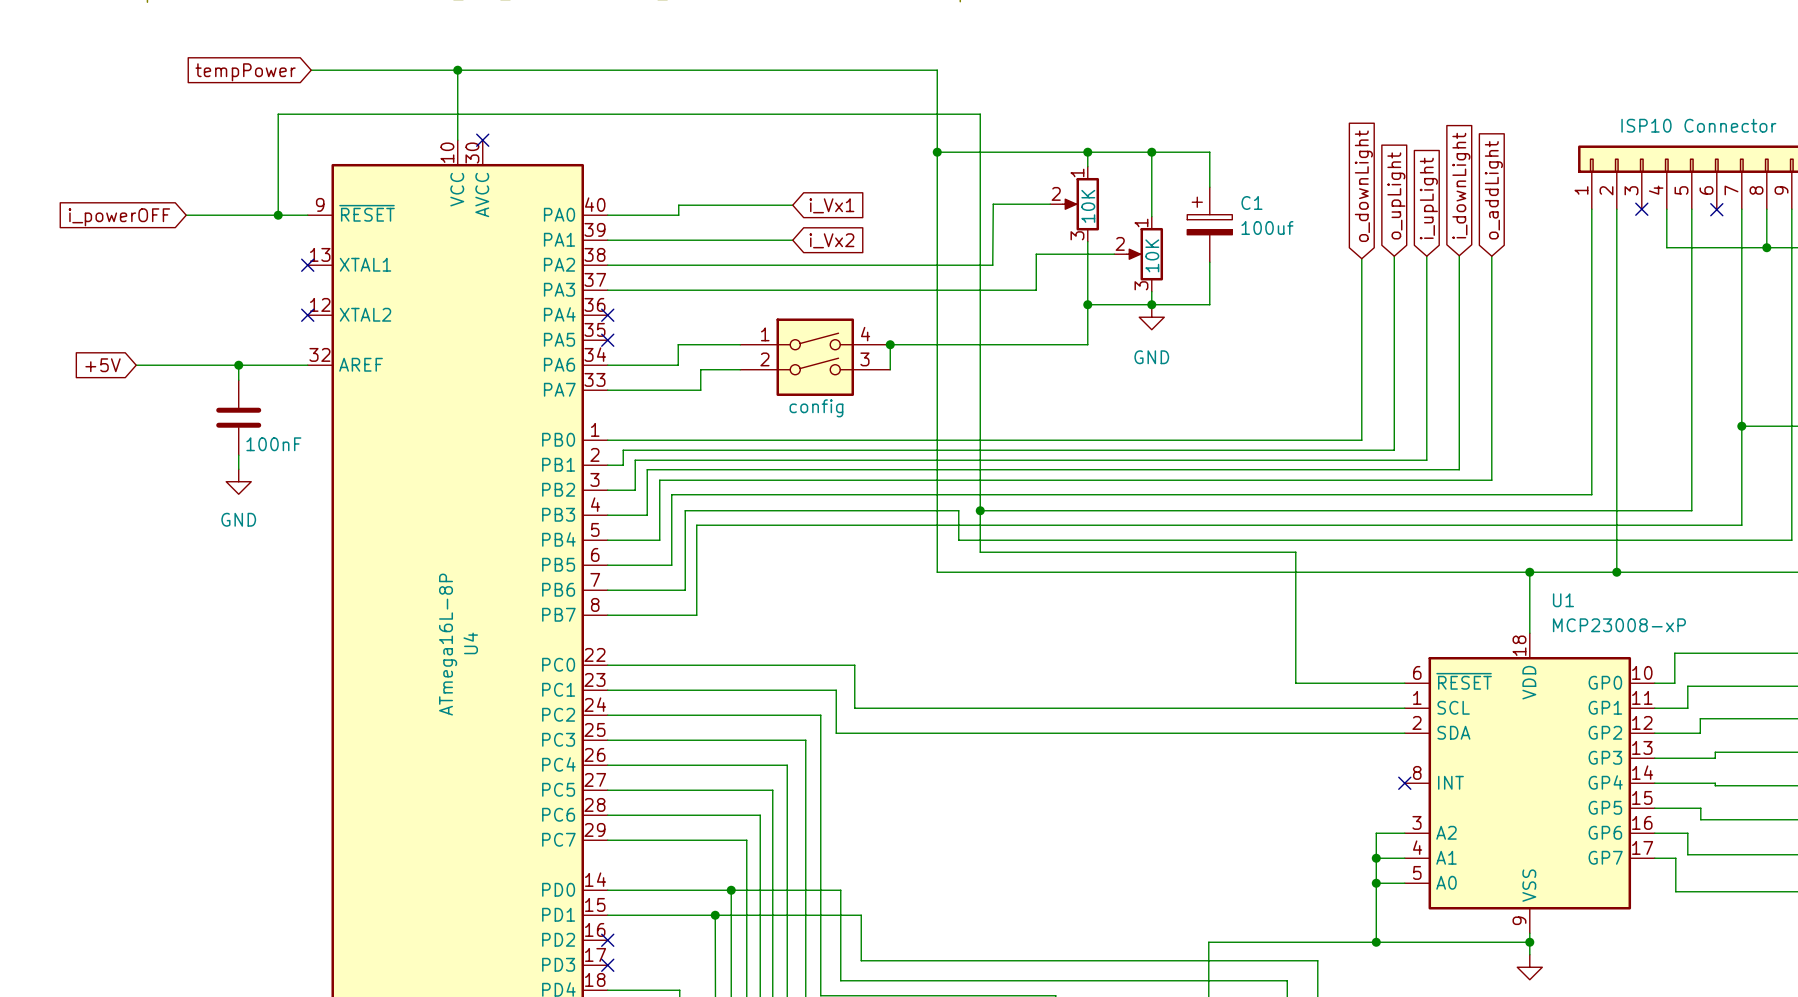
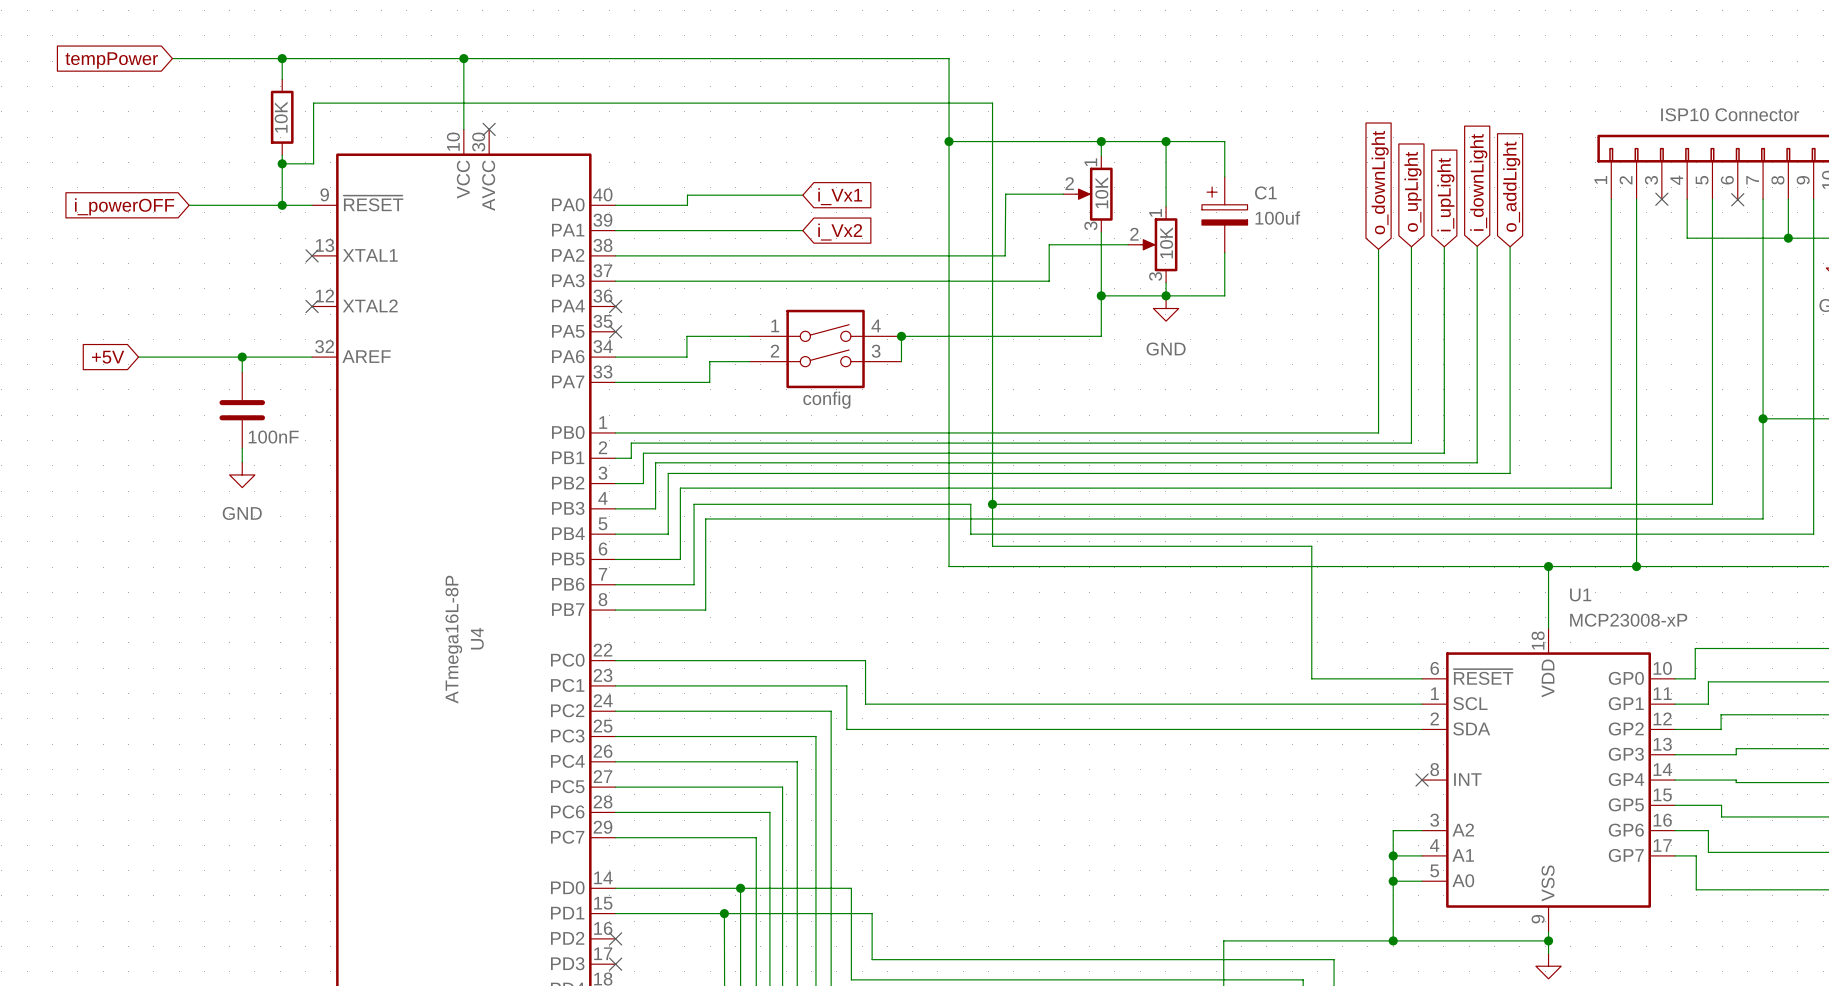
wire: none -> (172, 58) (315, 58)
wire: none -> (282, 58) (282, 79)
junction: none -> (282, 58)
global label position: tempPower (245, 72) -> tempPower (111, 60)
wire: (309, 114) (278, 114) (278, 165) -> (313, 103) (313, 163) (282, 163)
part: none -> 10K (282, 117)
junction: none -> (282, 163)

